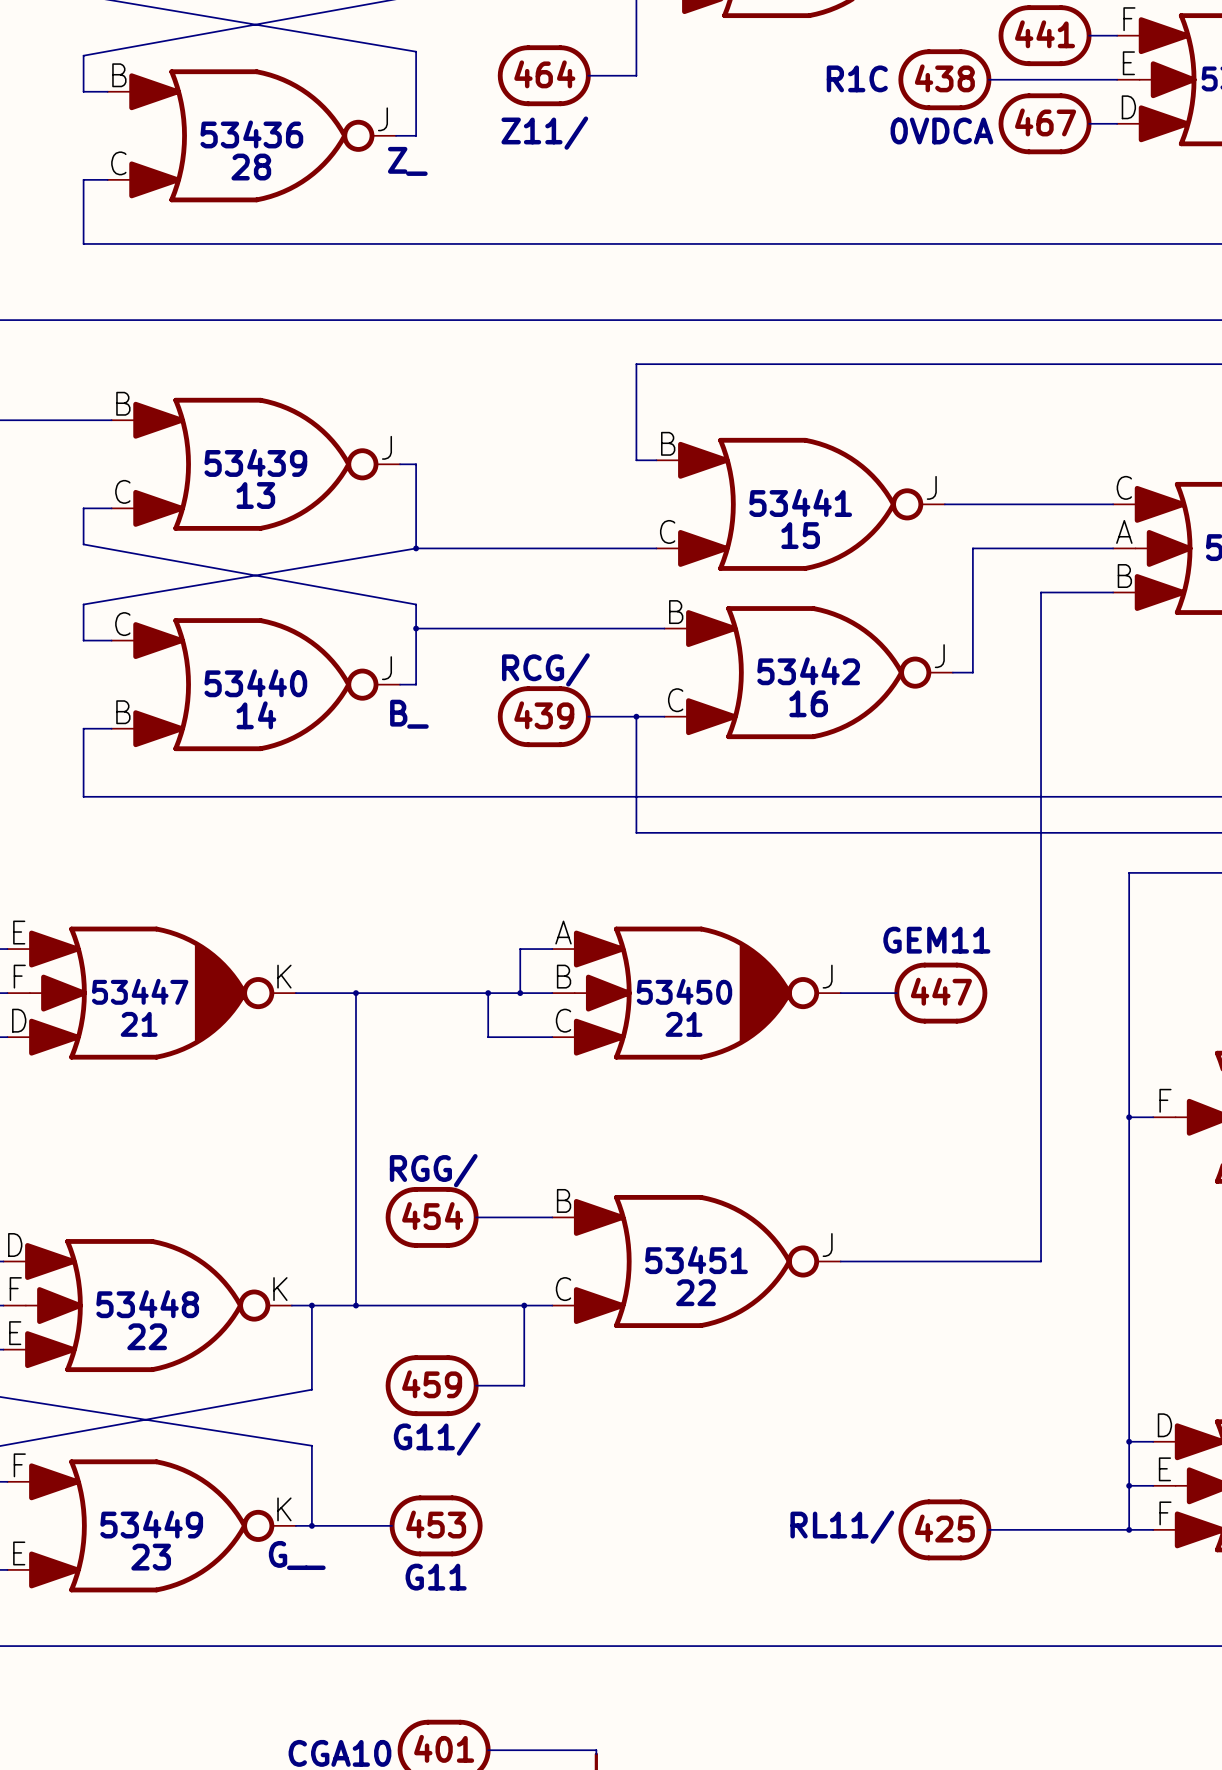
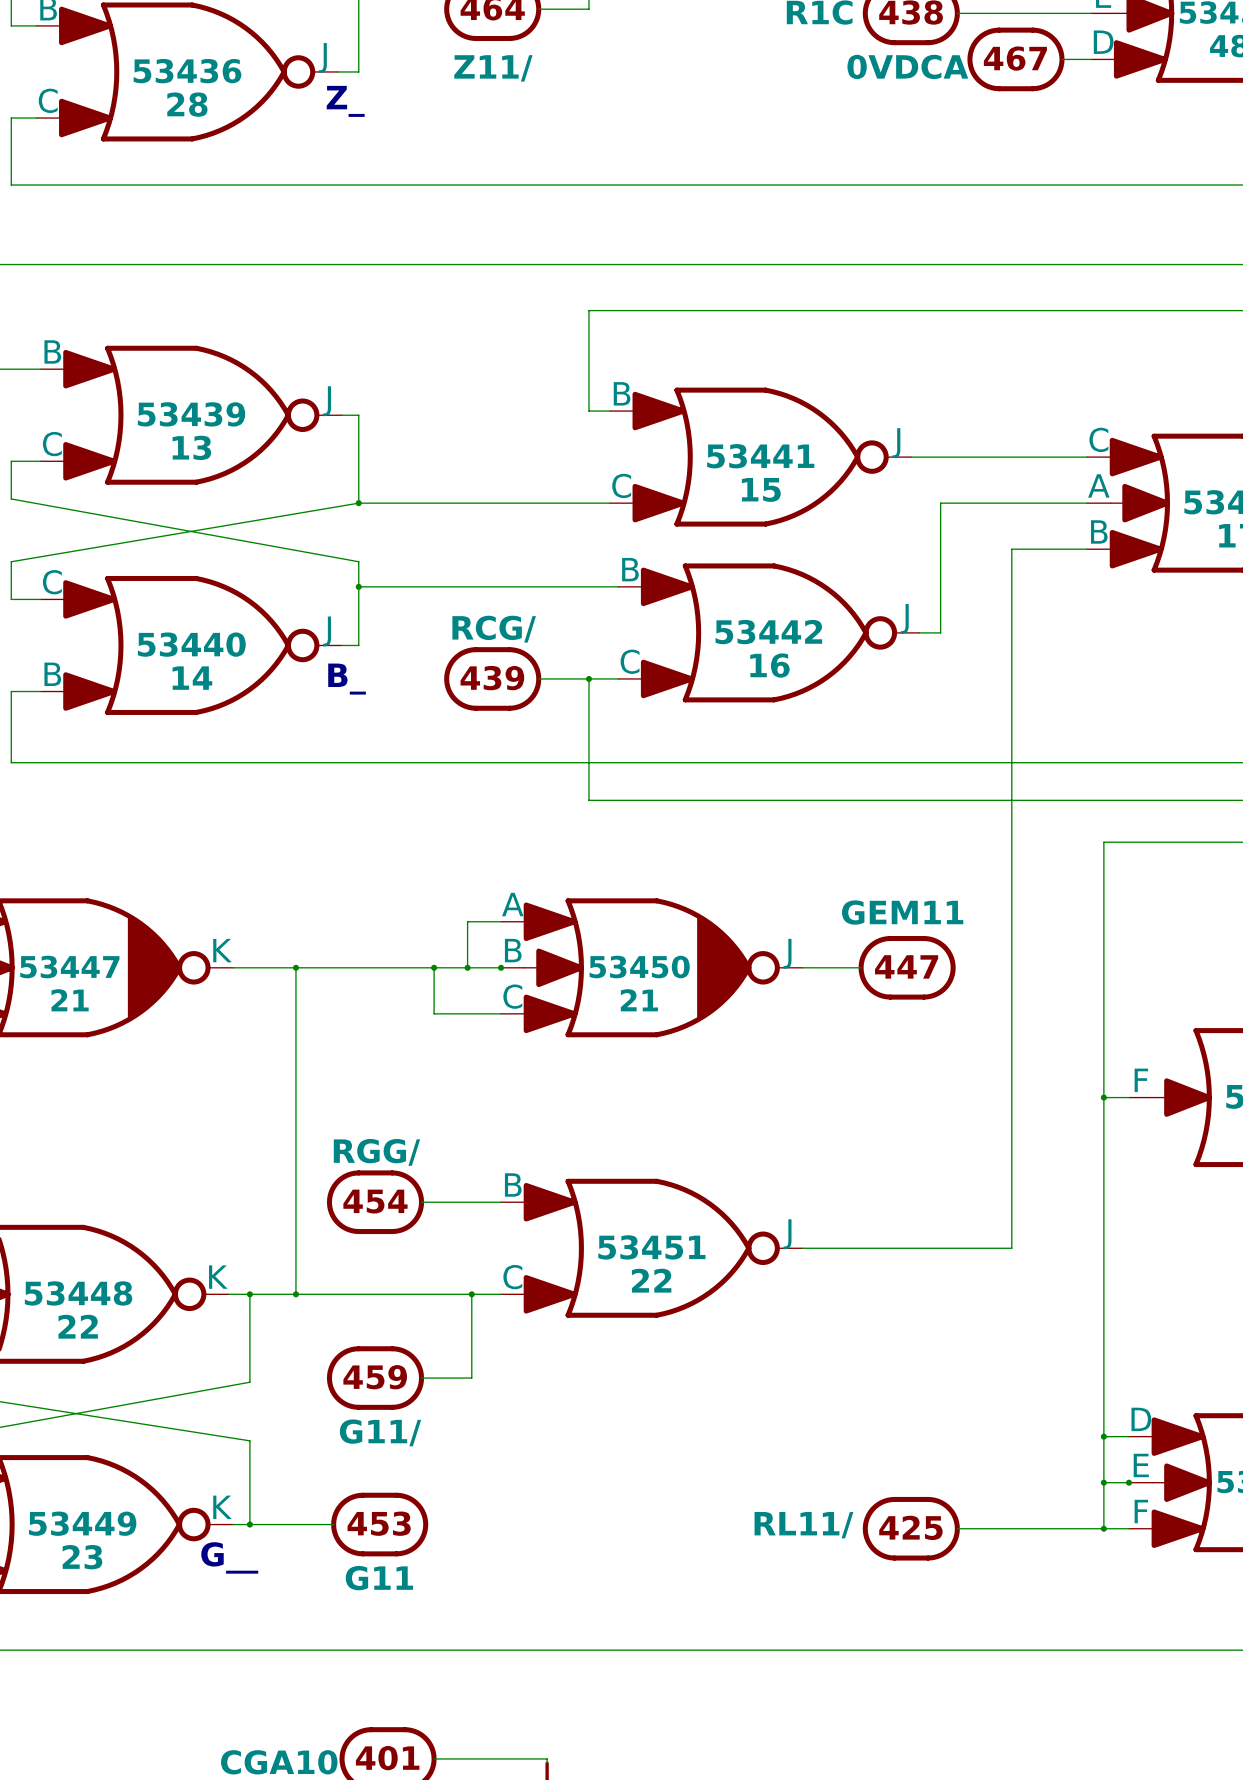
junction: none -> (501, 967)
junction: none -> (1128, 1482)

